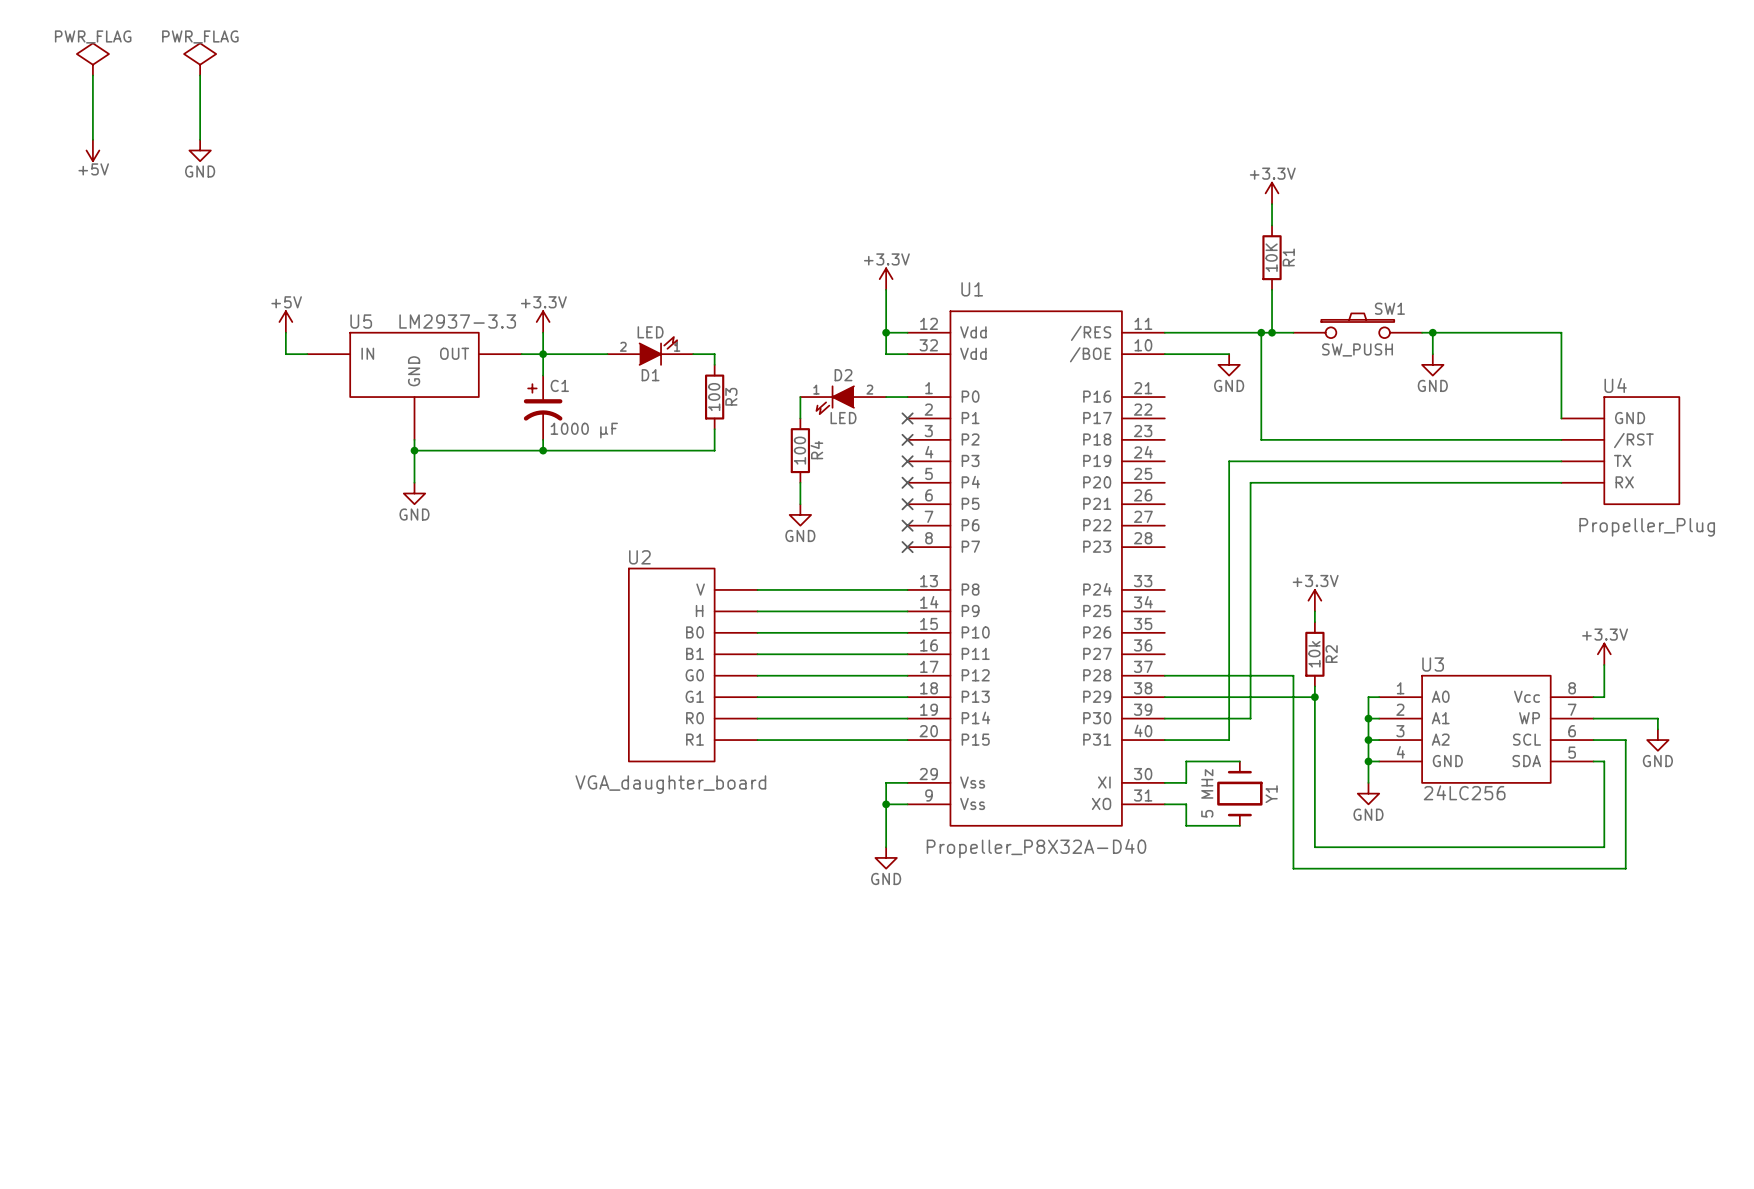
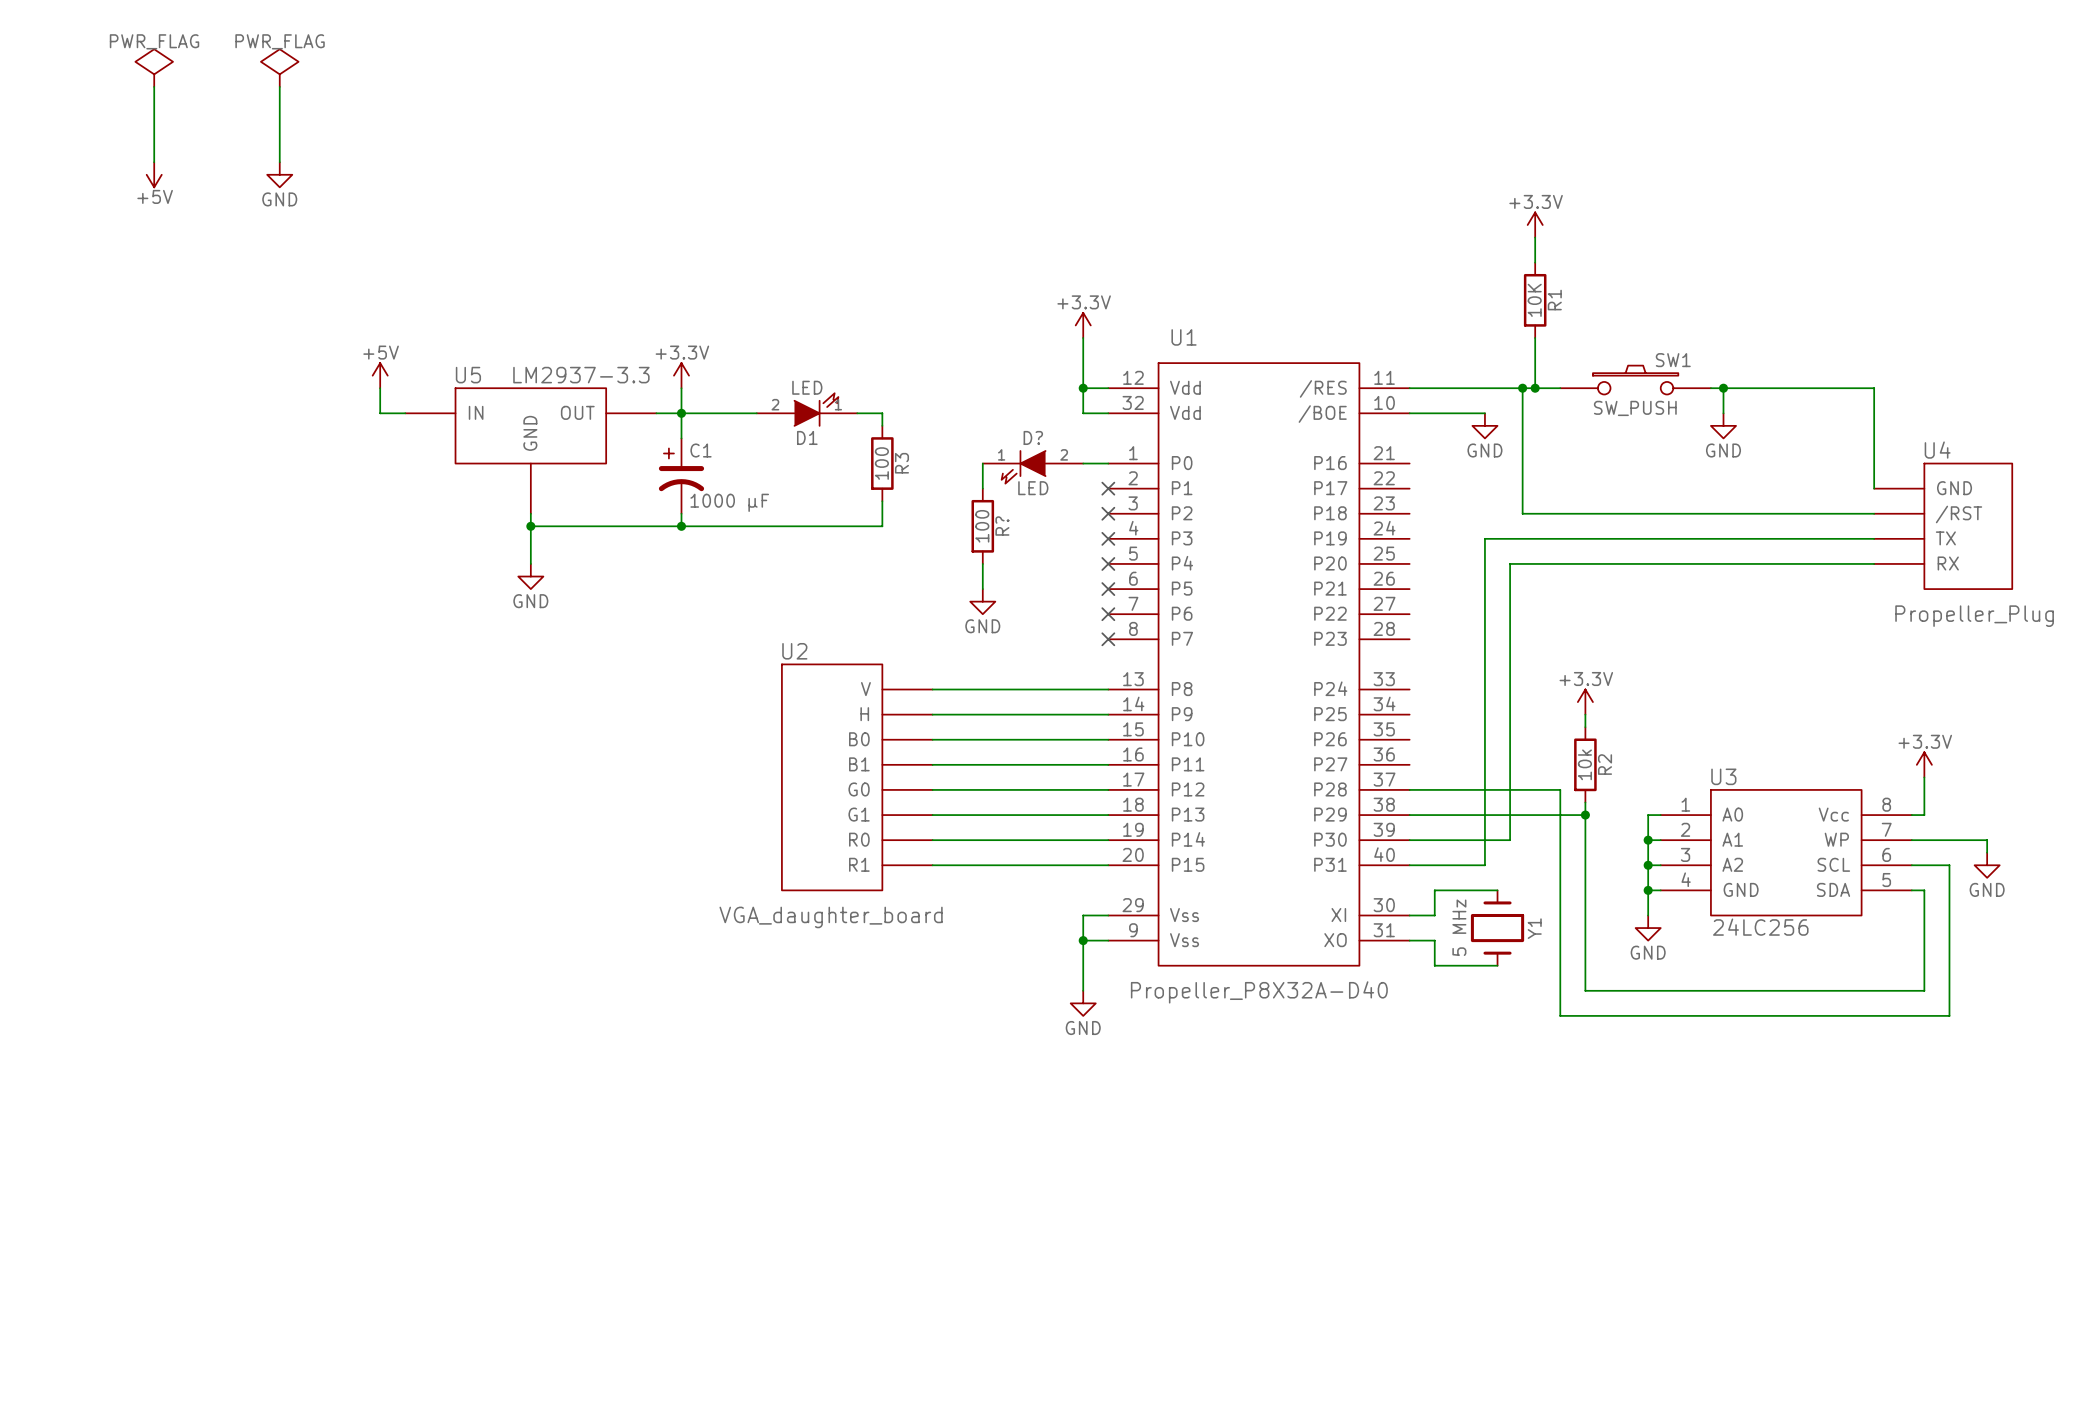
D2 name: D2 (843, 375) -> D? (1033, 437)
R4 name: R4 (816, 450) -> R? (1002, 526)

